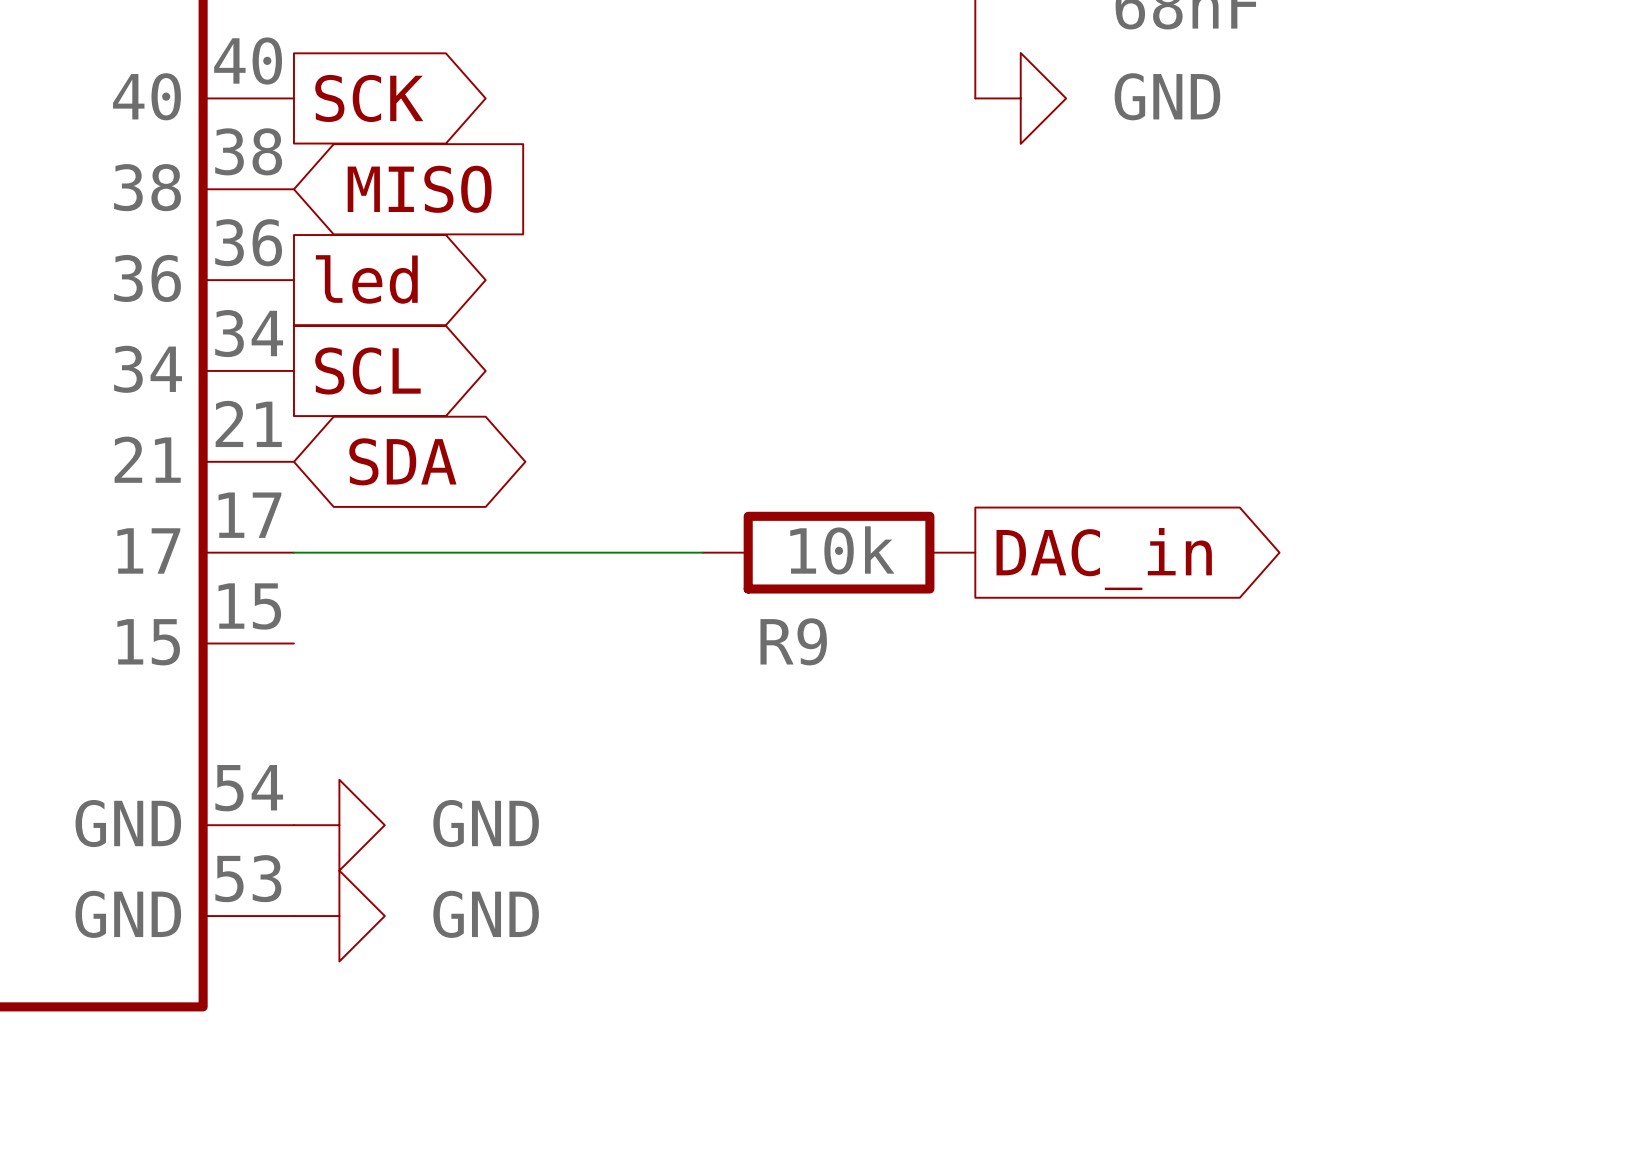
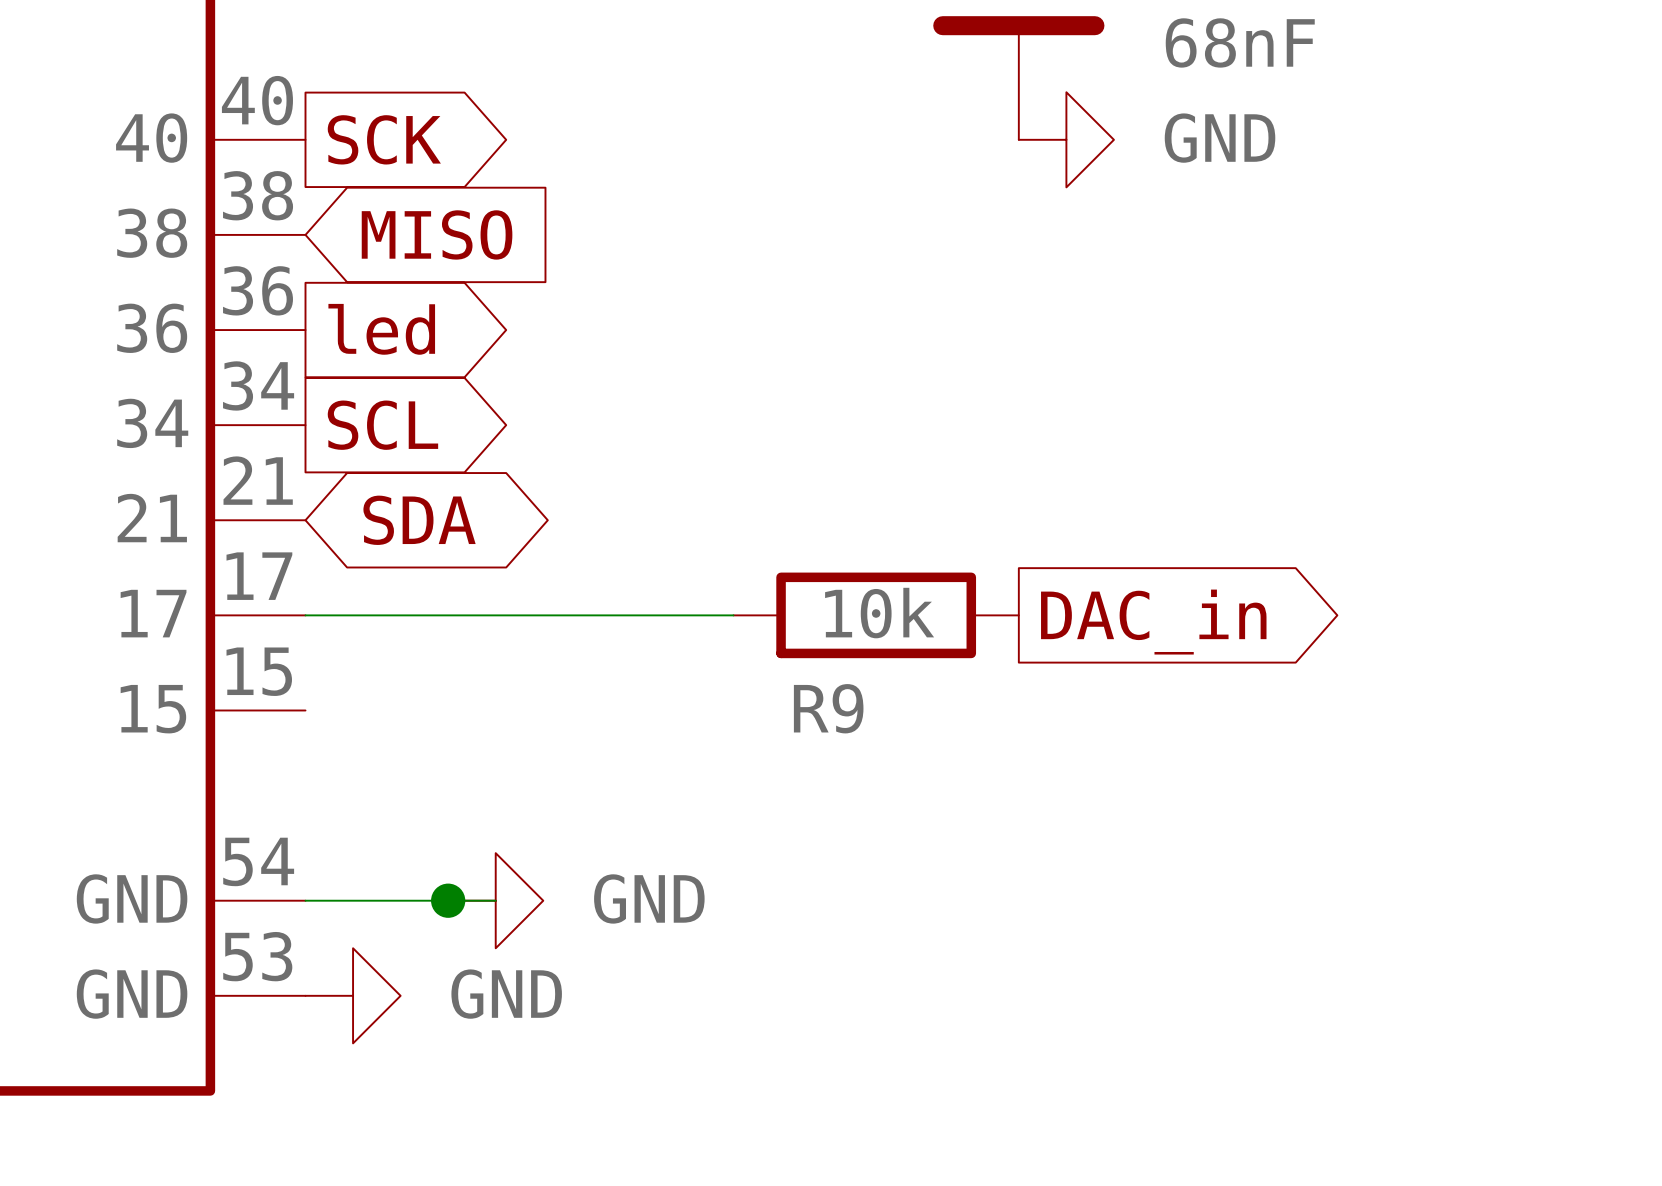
wire: none -> (305, 900) (495, 900)
power symbol position: GND (339, 825) -> GND (495, 900)
junction: none -> (448, 900)

